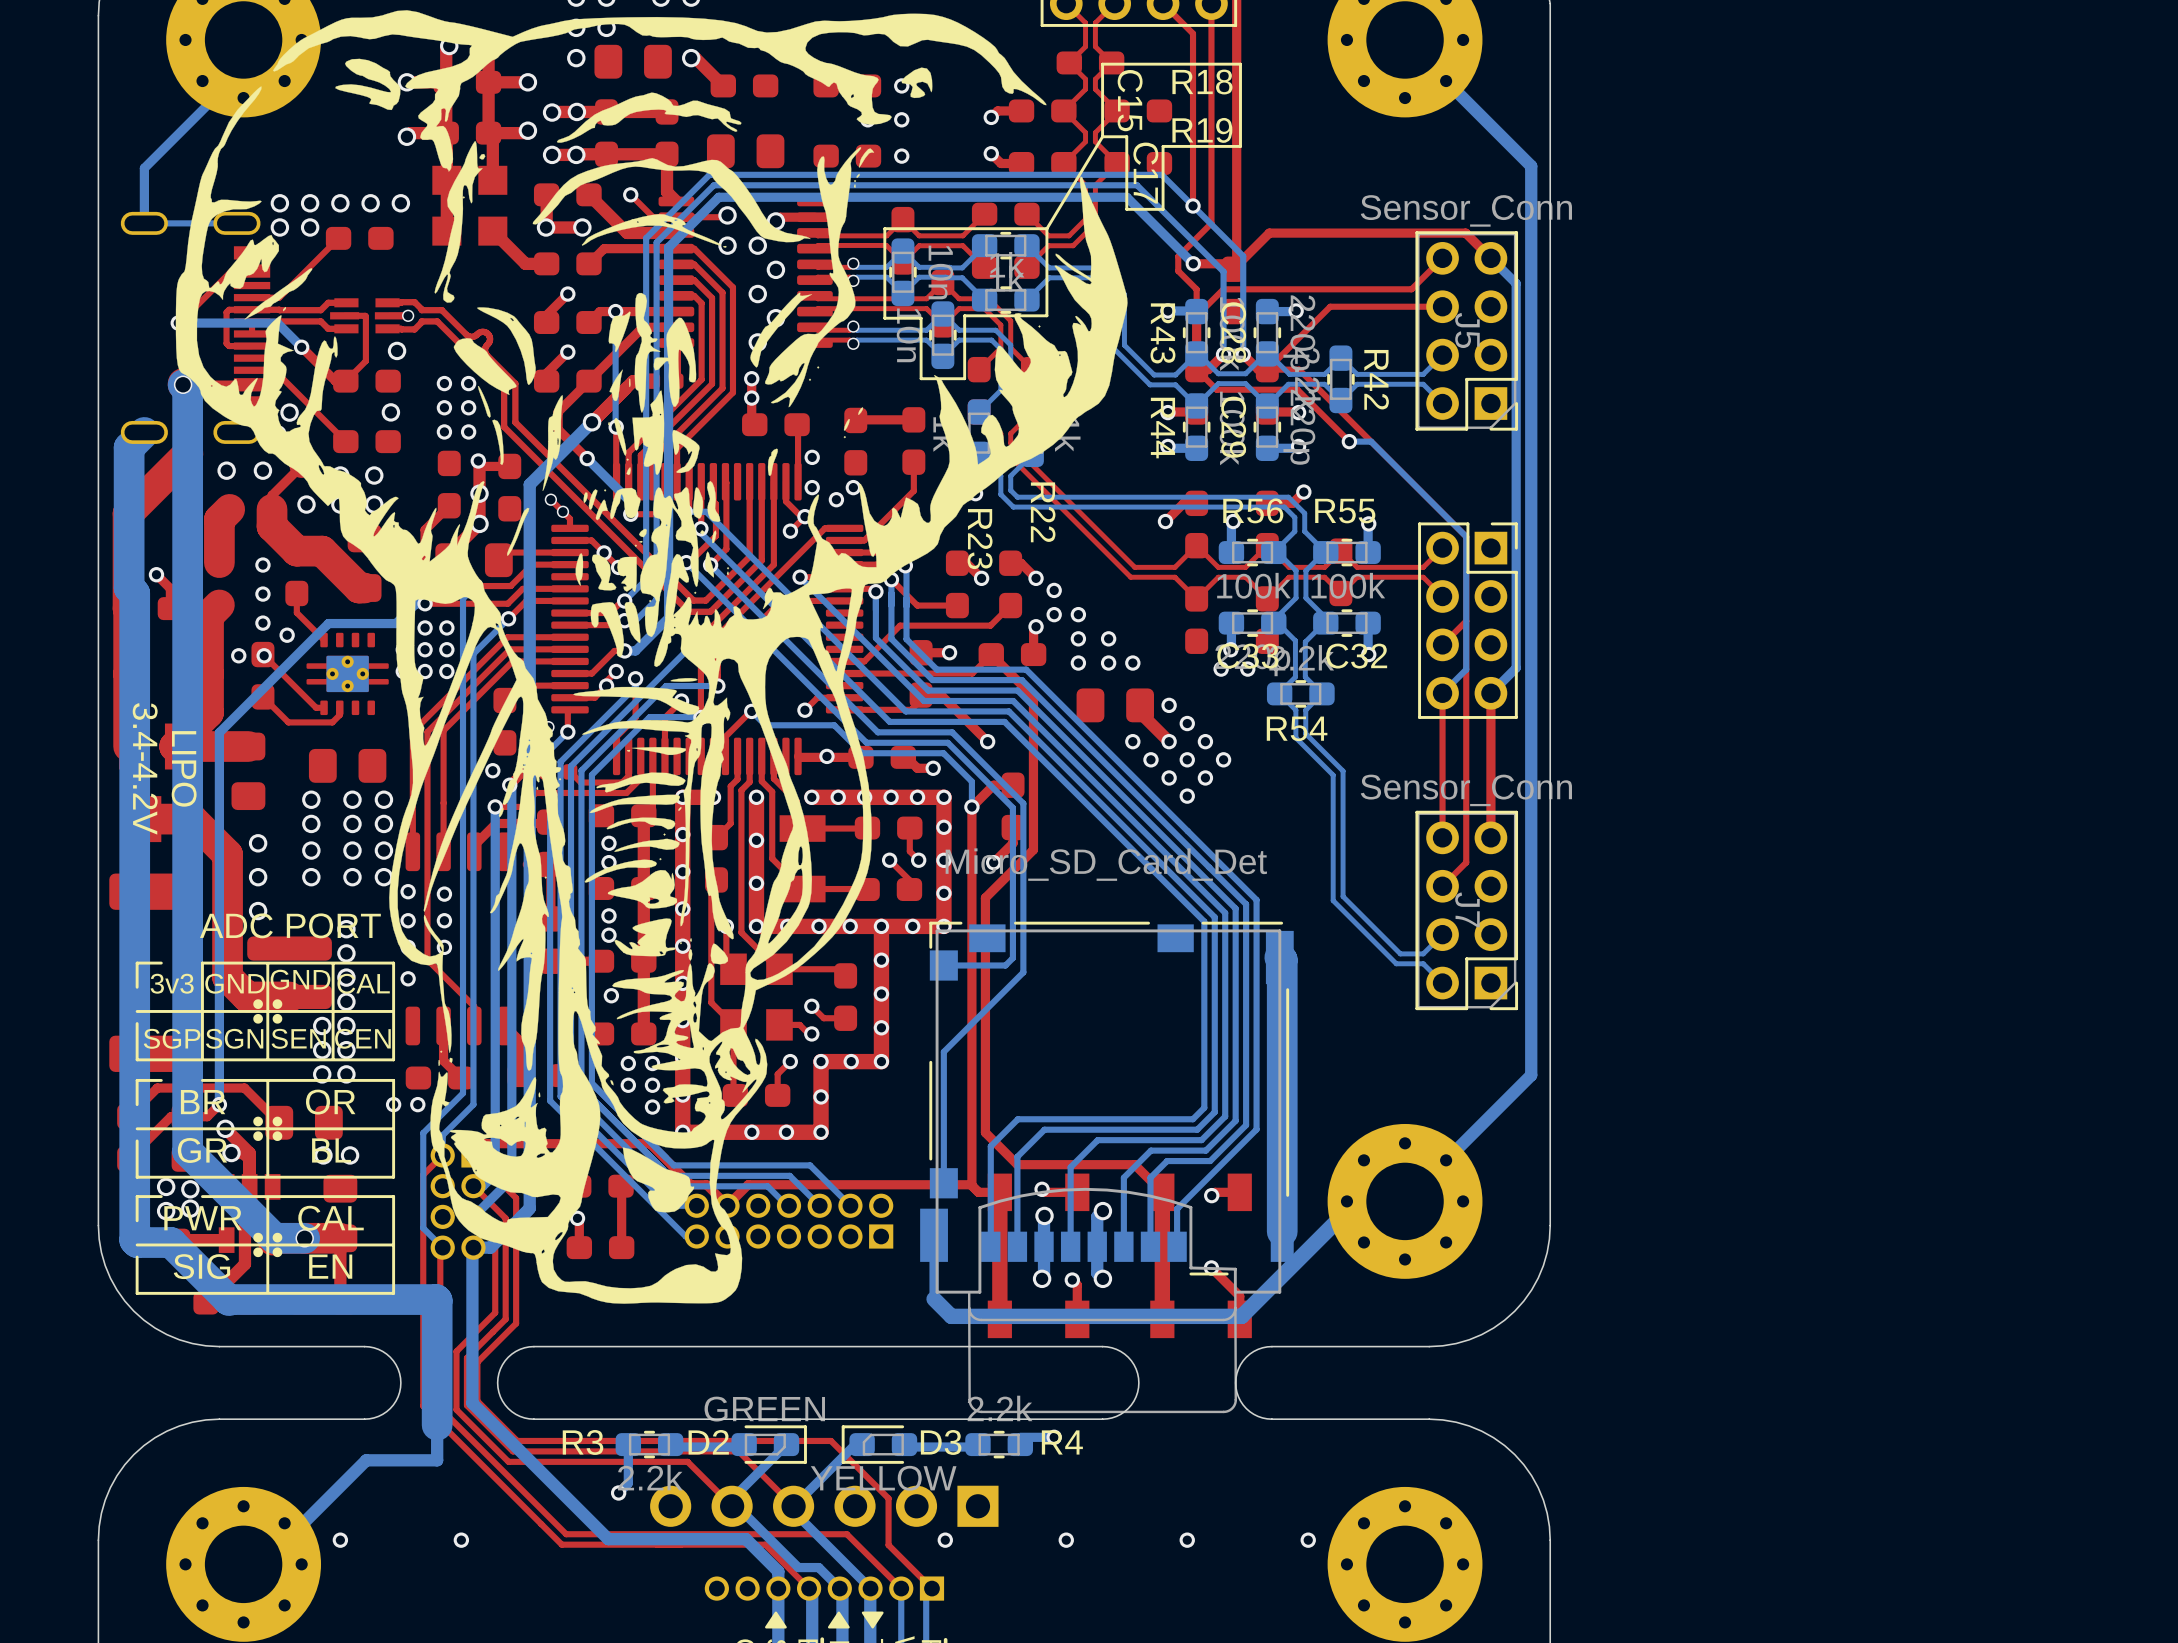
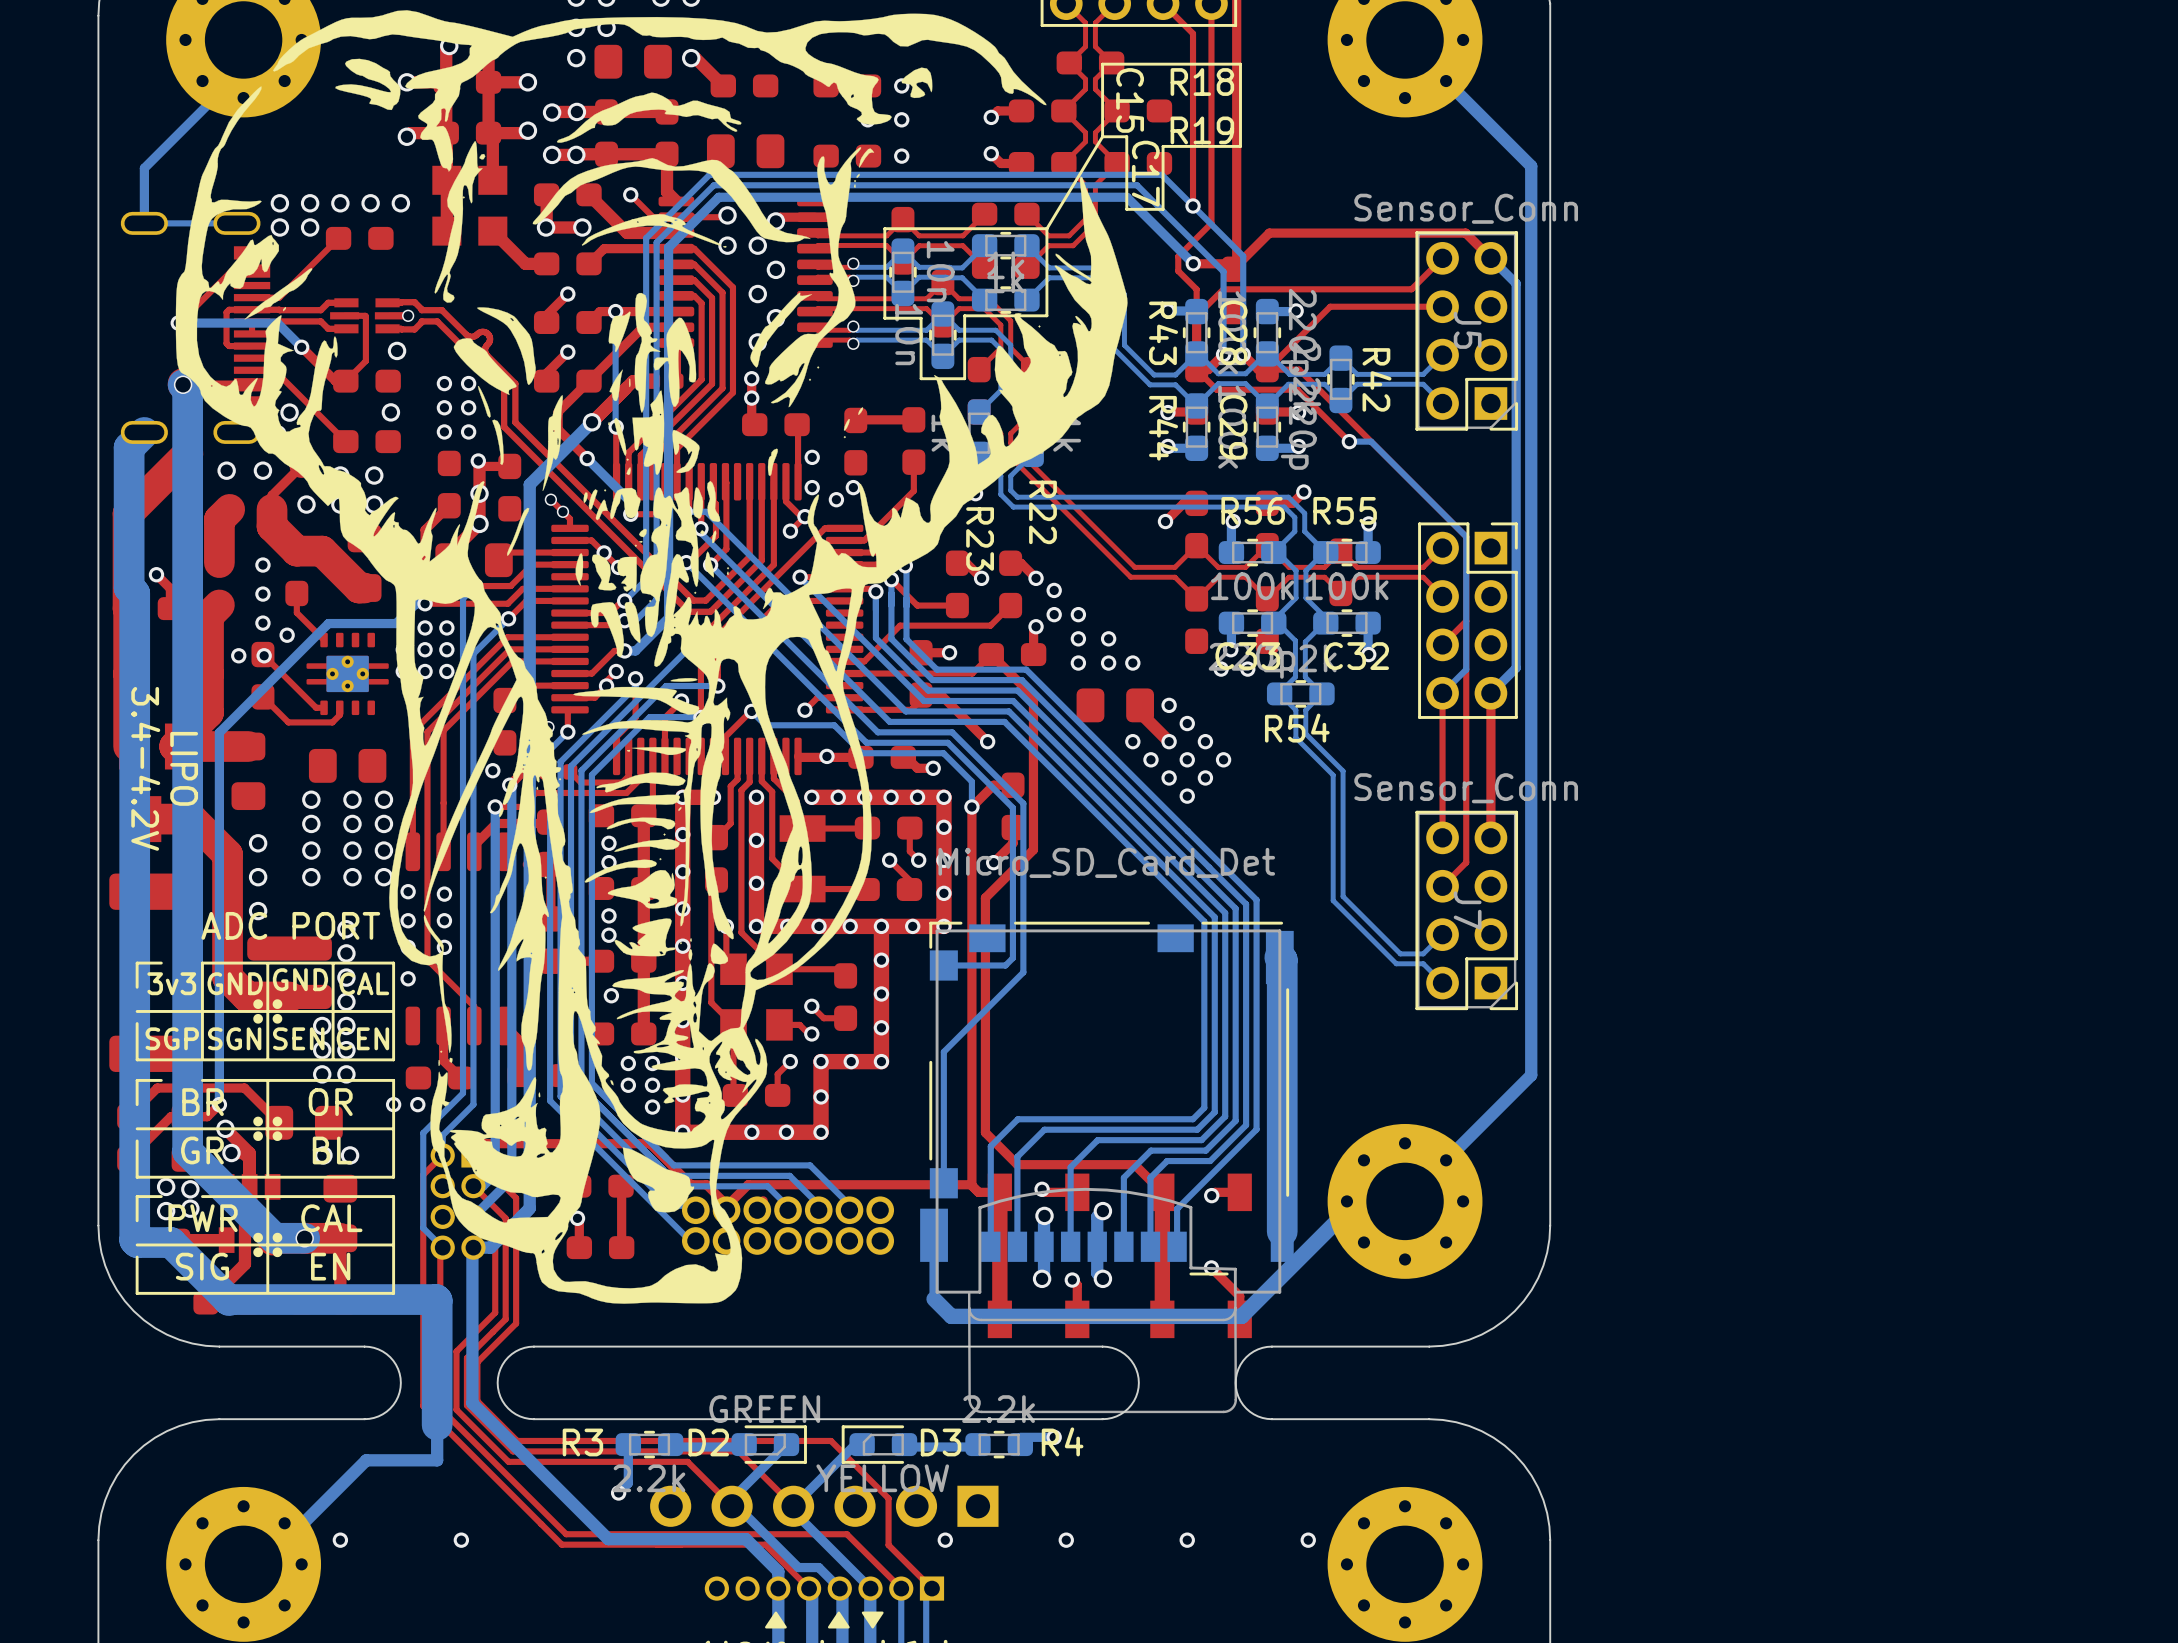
part footprint: [684, 1193, 894, 1249] -> [682, 1196, 895, 1255]

